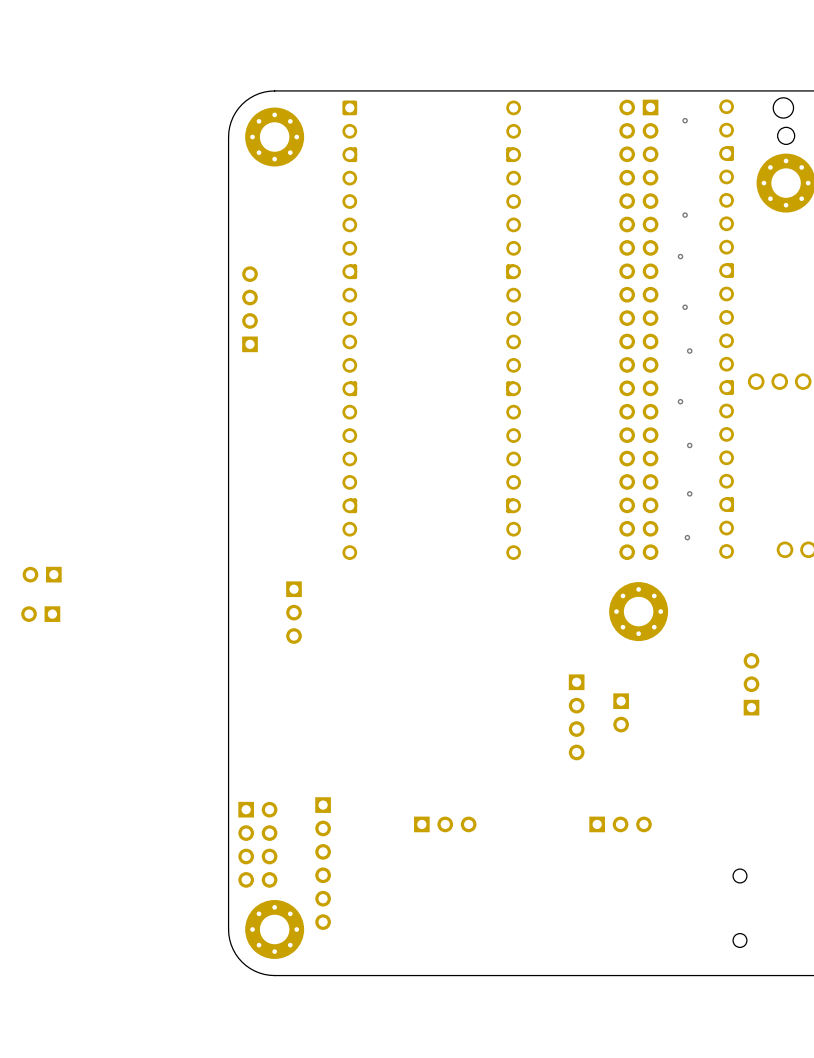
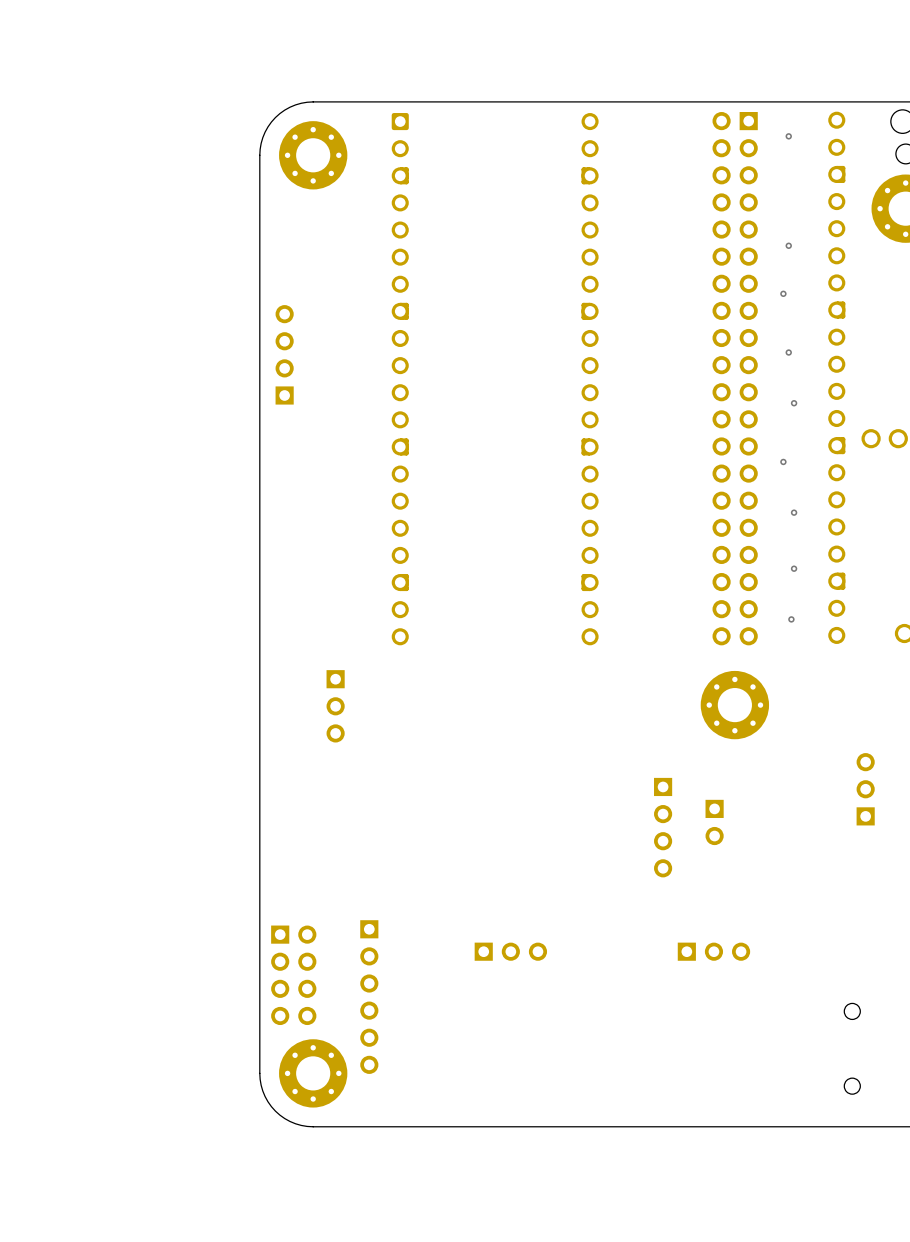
part: (42, 574) -> none
part: (40, 614) -> none

